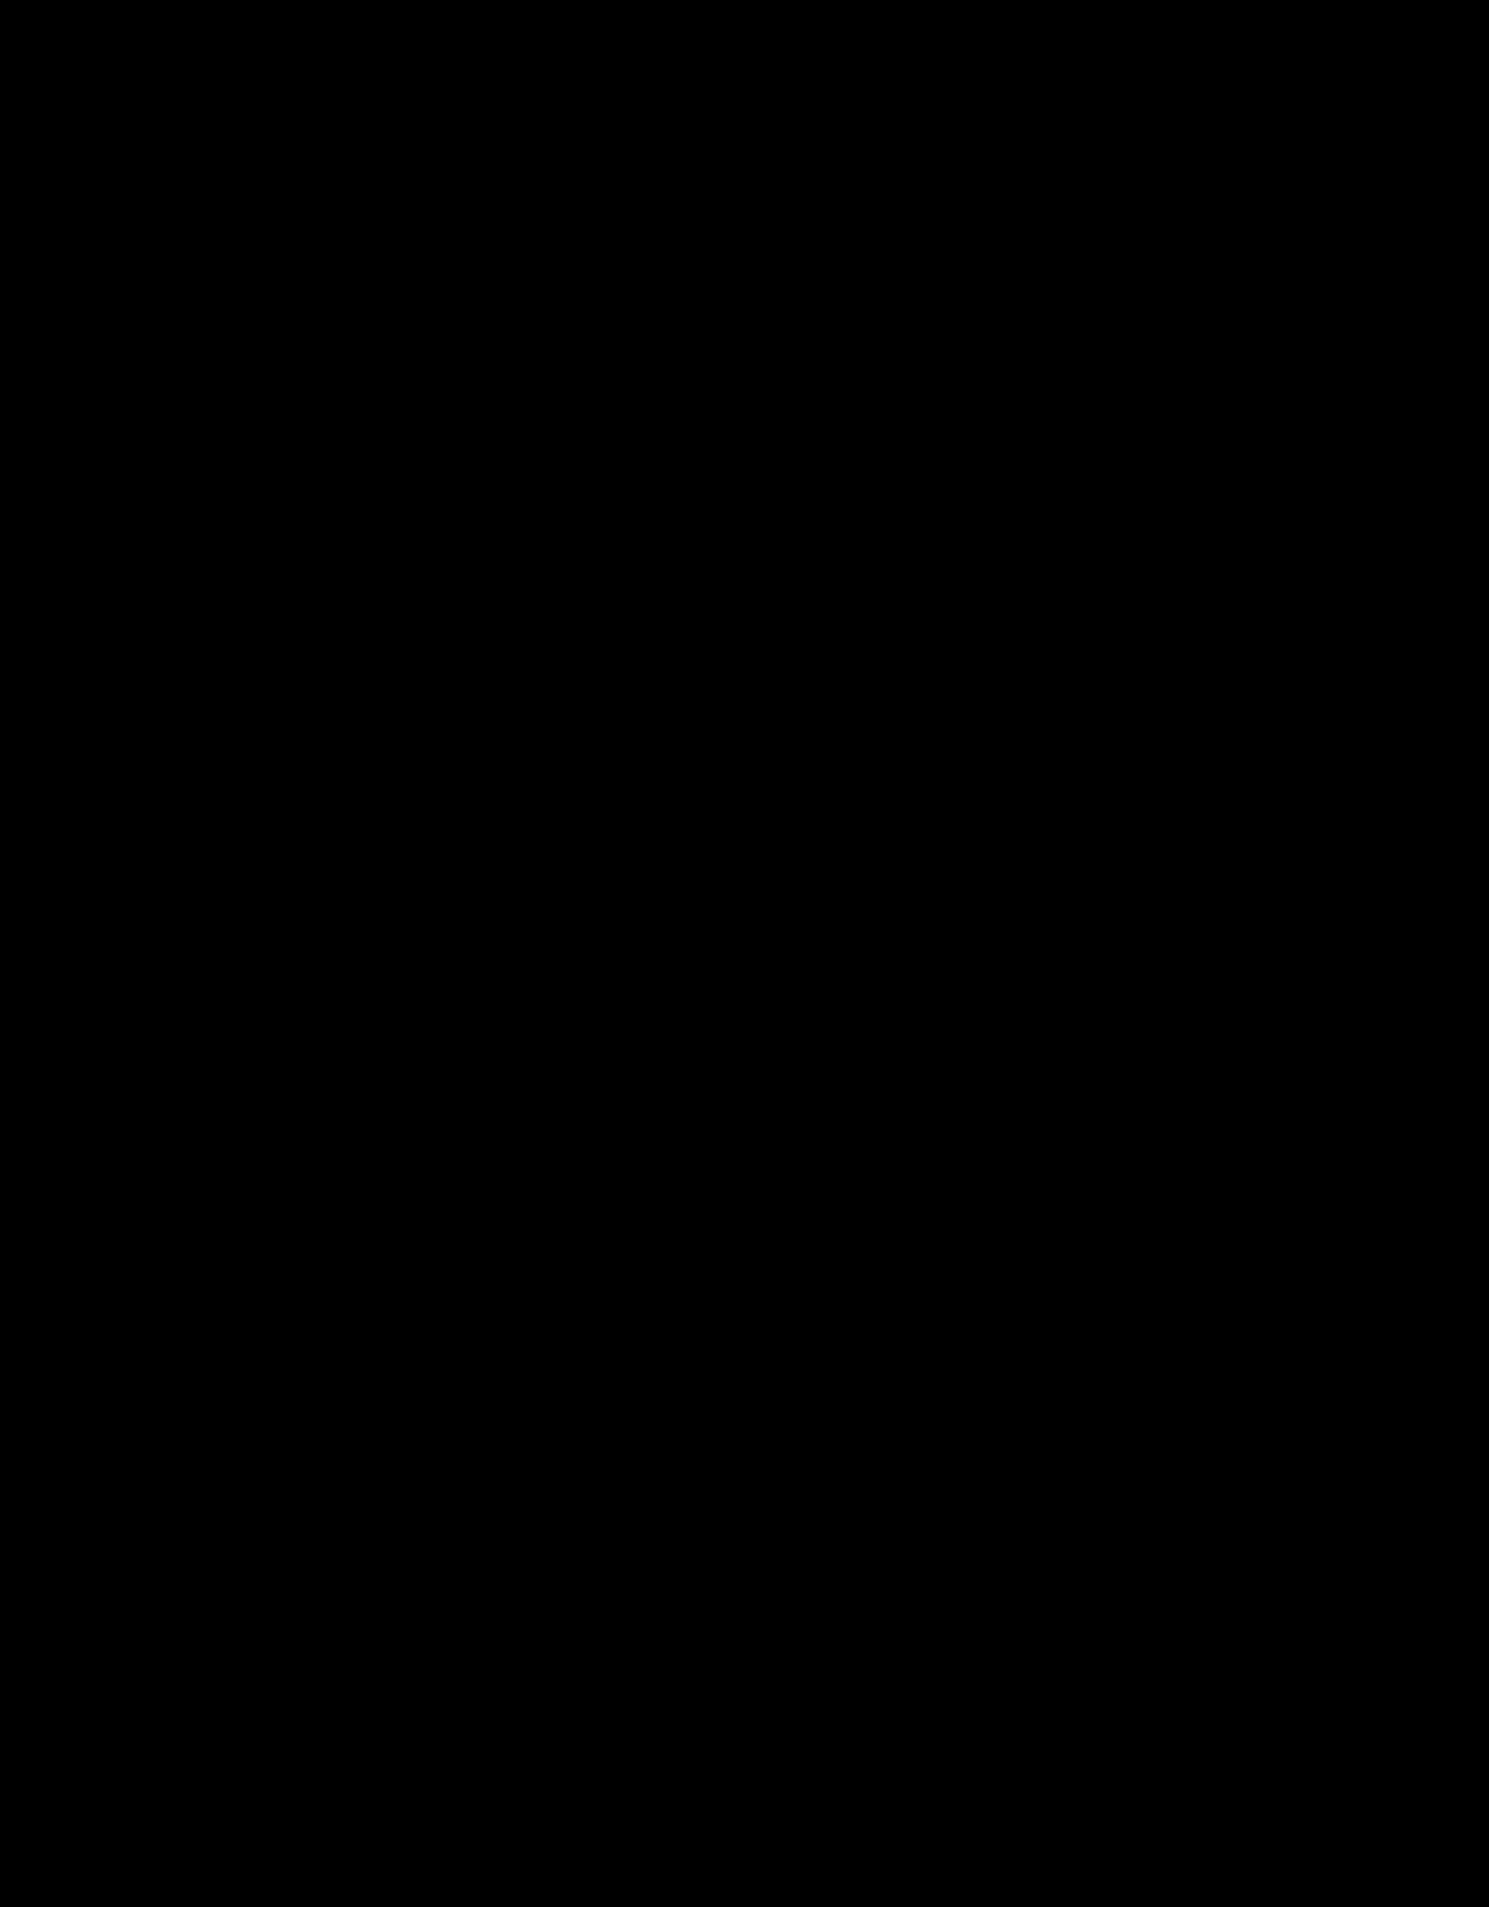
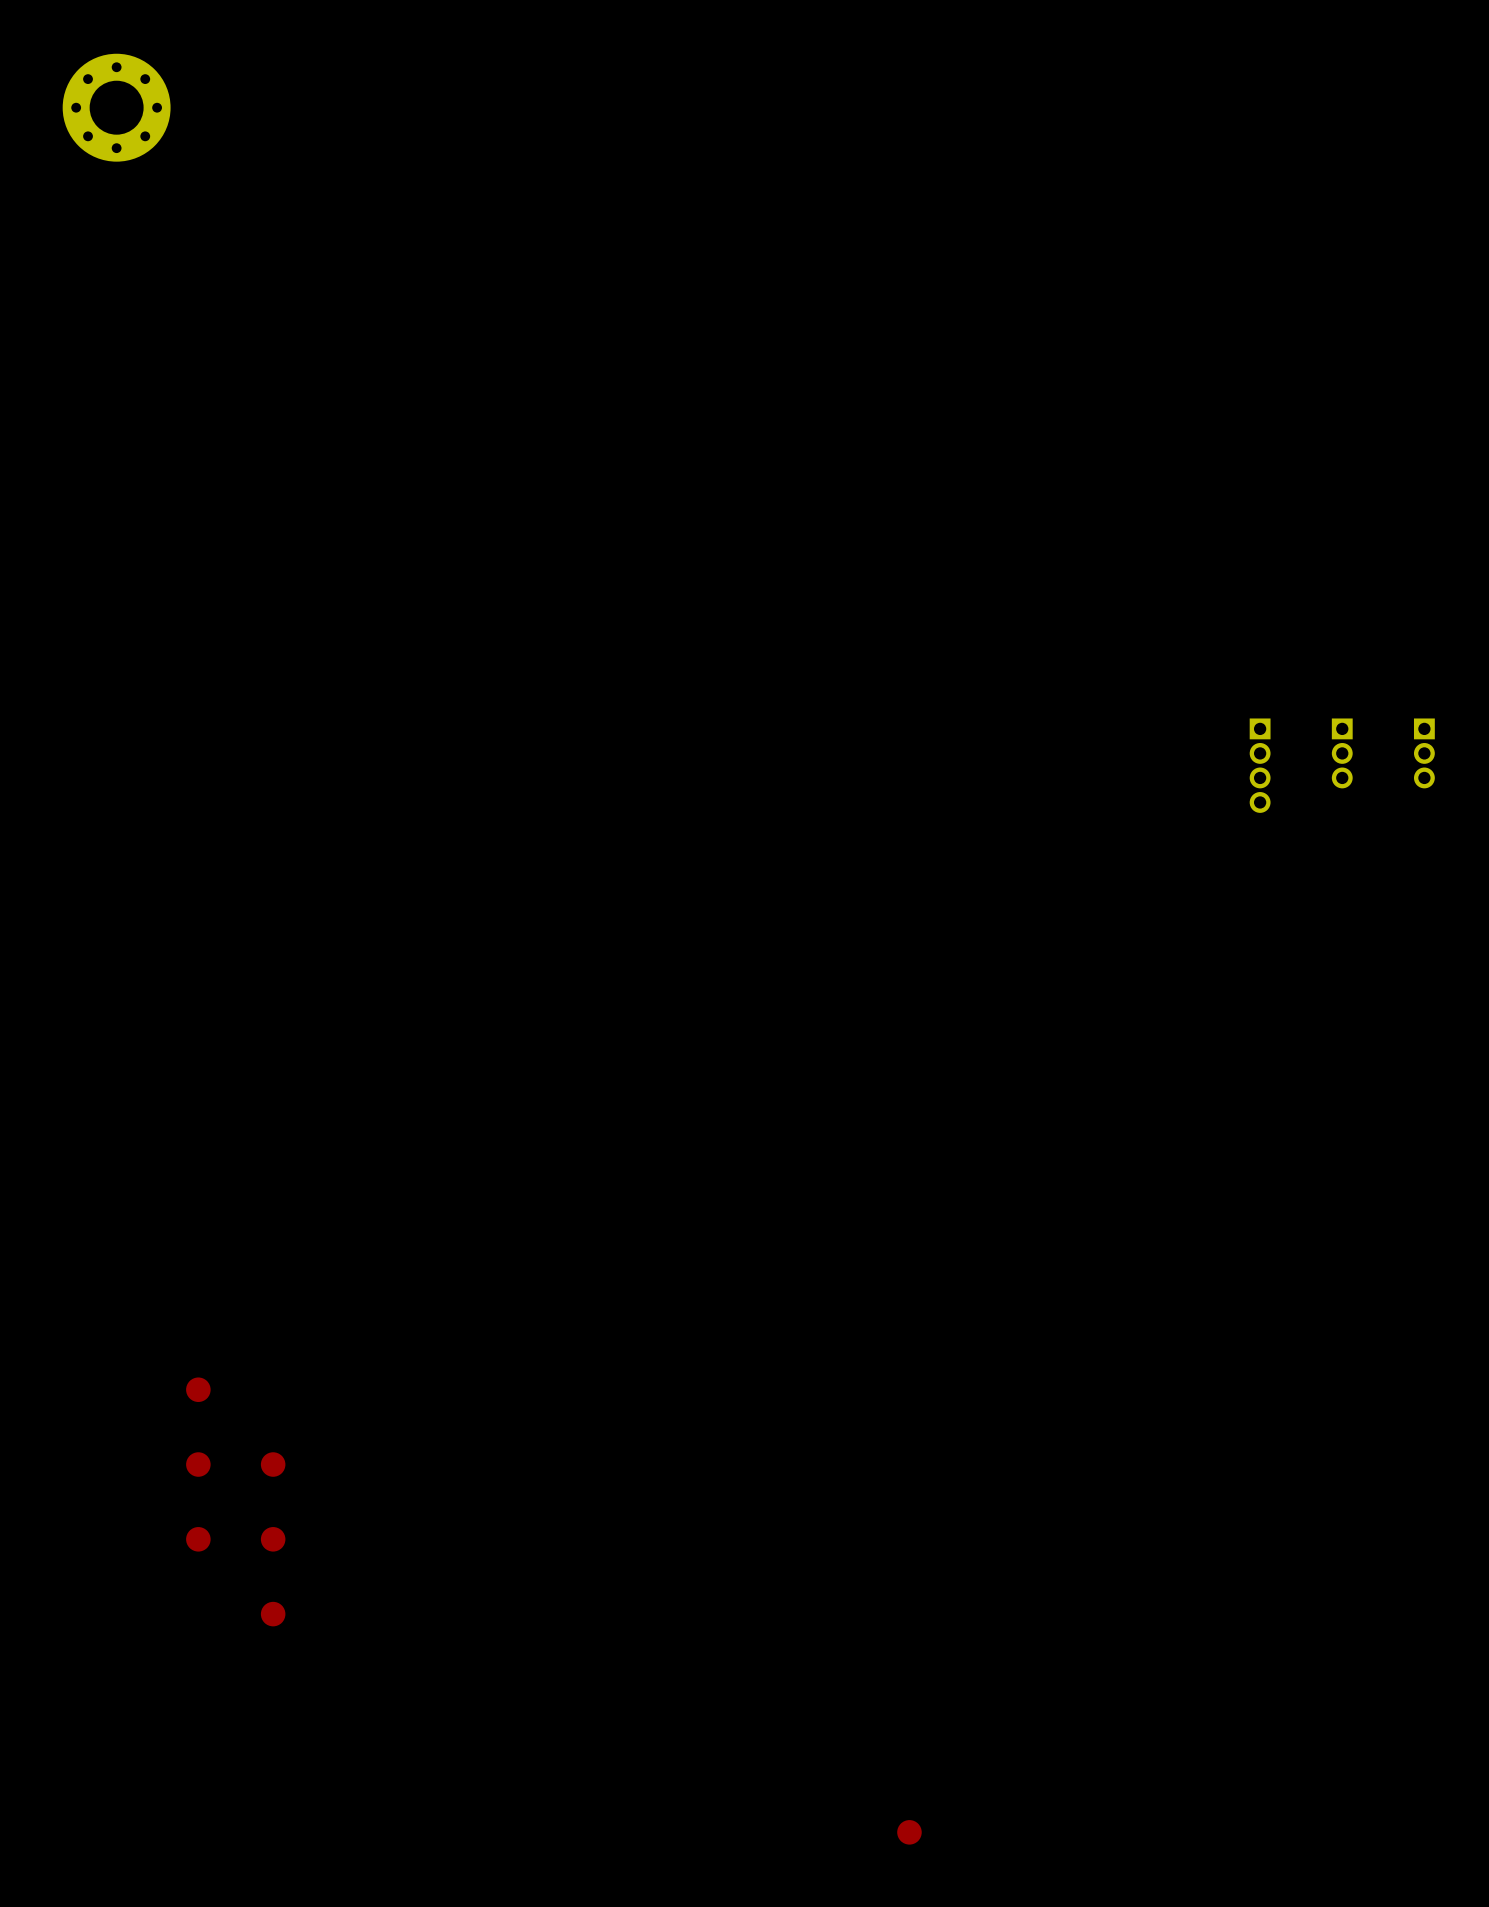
part: none -> (116, 107)
part: none -> (1342, 753)
part: none -> (1424, 753)
part: none -> (1260, 765)
part: none -> (198, 1389)
part: none -> (198, 1464)
part: none -> (273, 1464)
part: none -> (198, 1539)
part: none -> (273, 1539)
part: none -> (273, 1614)
part: none -> (909, 1832)

